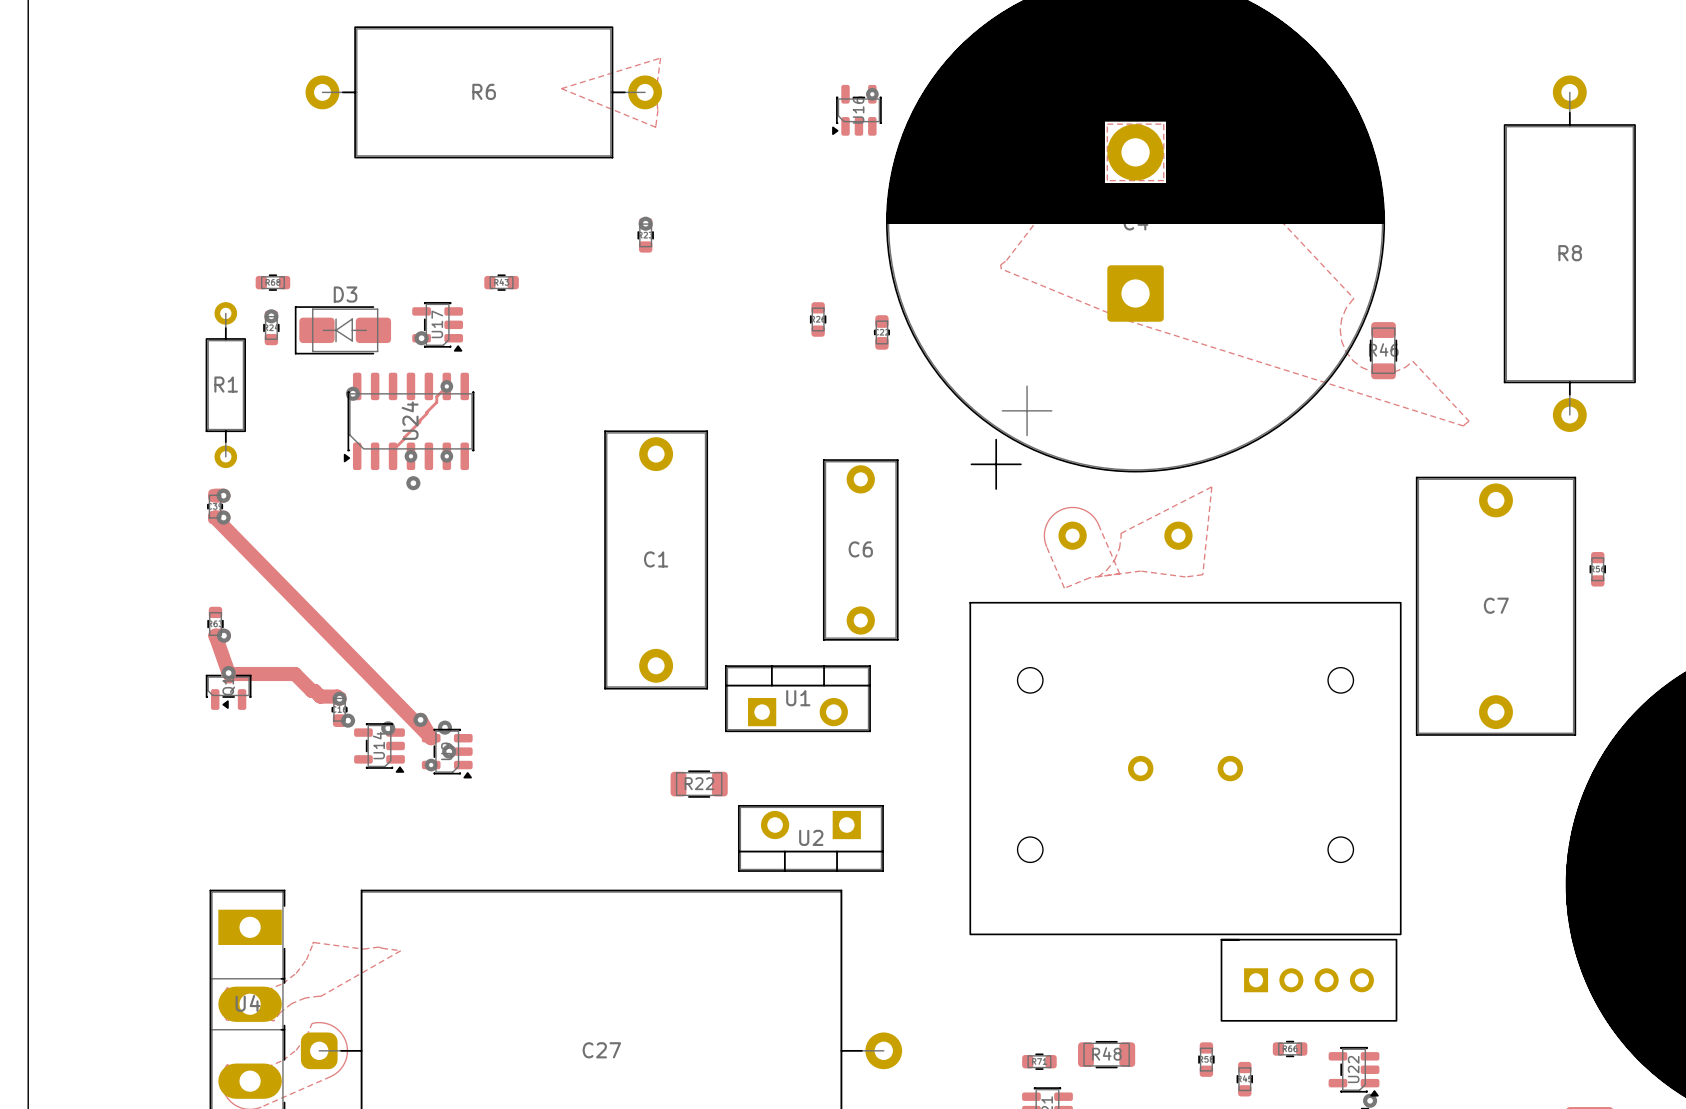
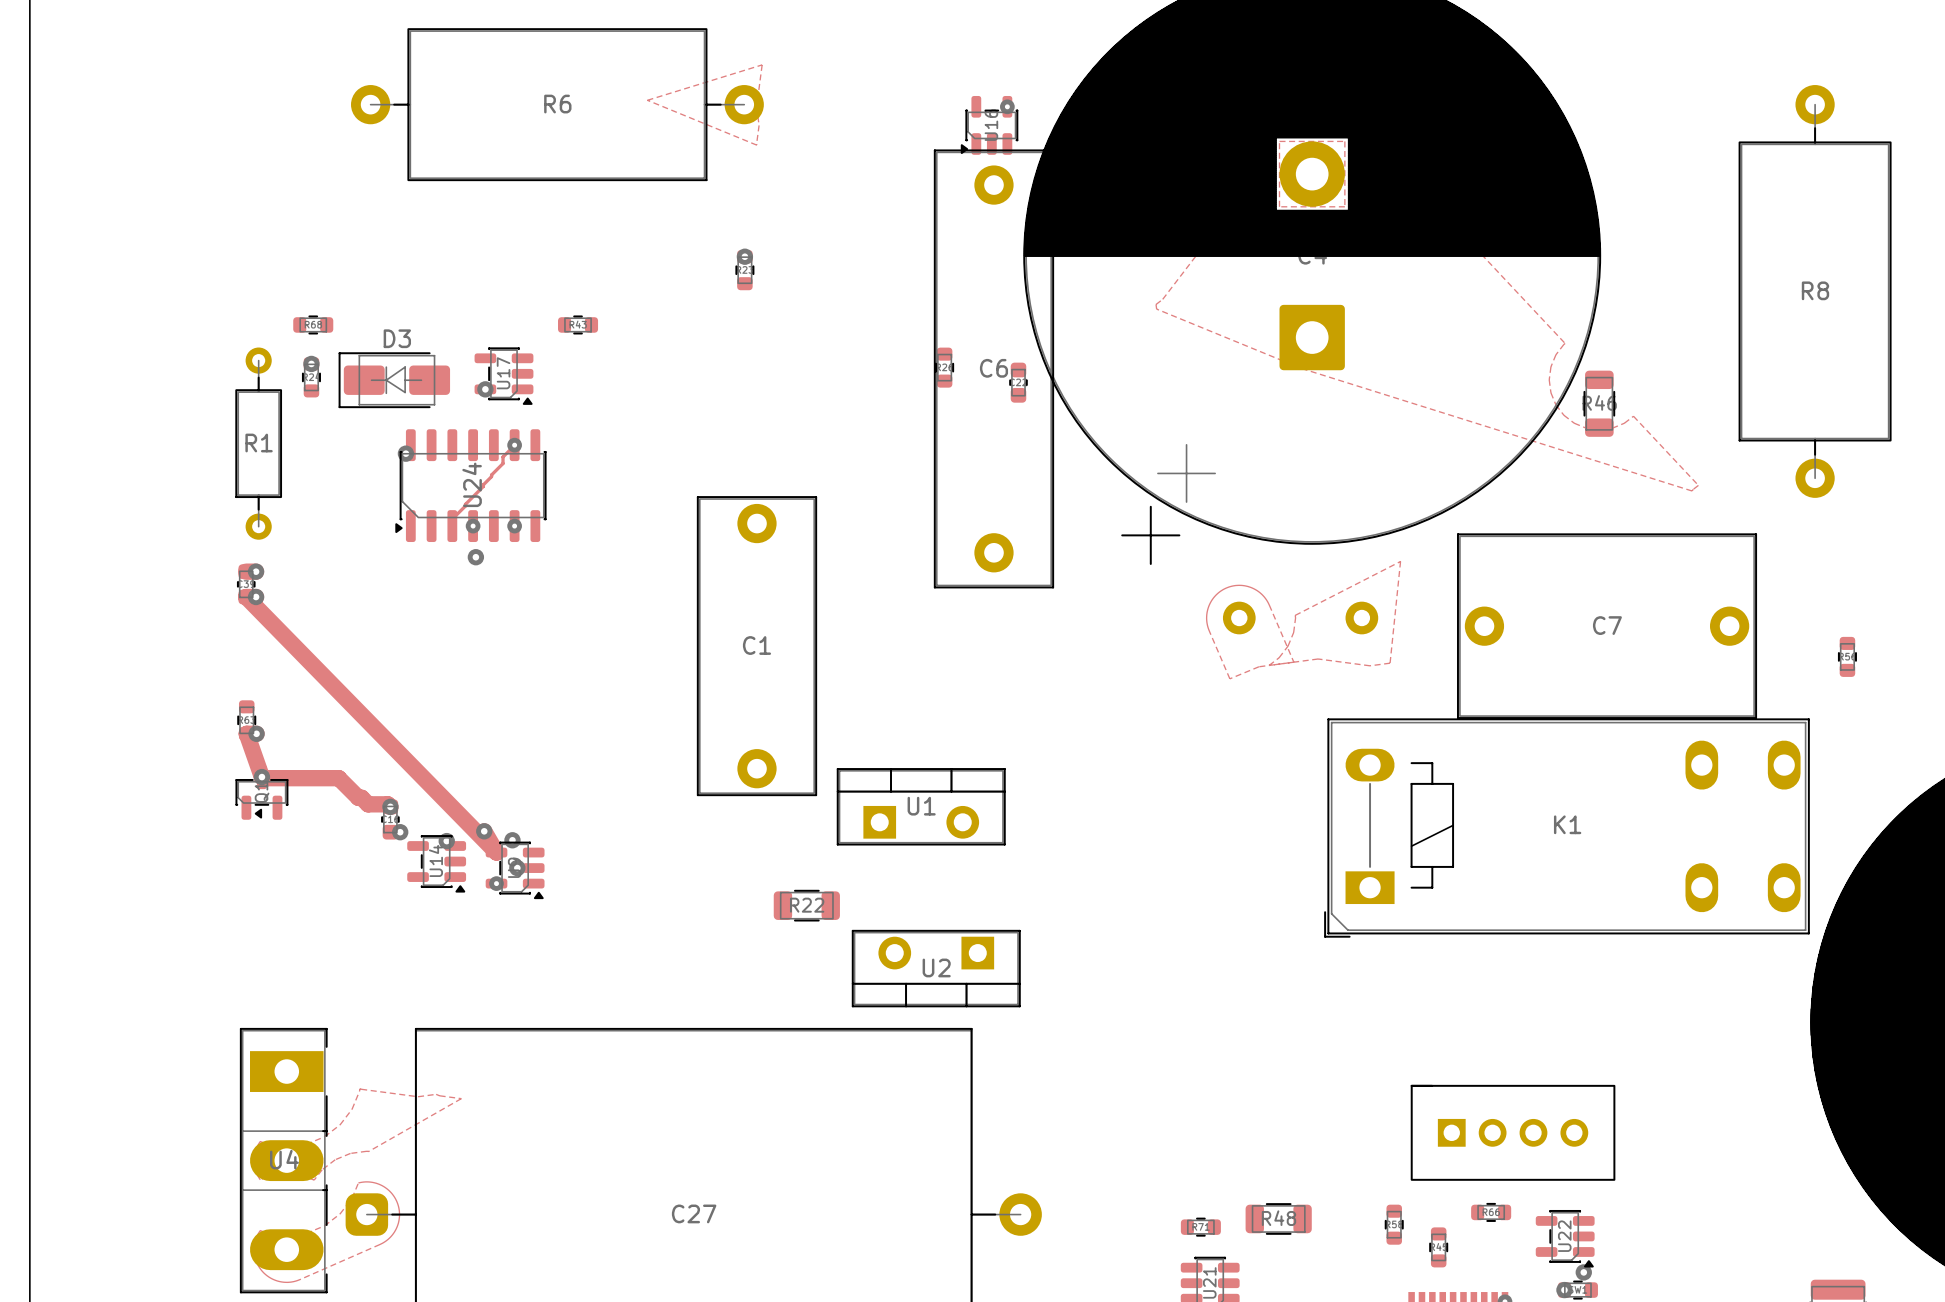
C6 footprint: [822, 459, 899, 641] -> [933, 149, 1055, 589]
C7 rotation: 0° (1496, 606) -> 90° clockwise (1607, 626)
K1: none -> (1566, 828)
part: (1185, 768) -> none

